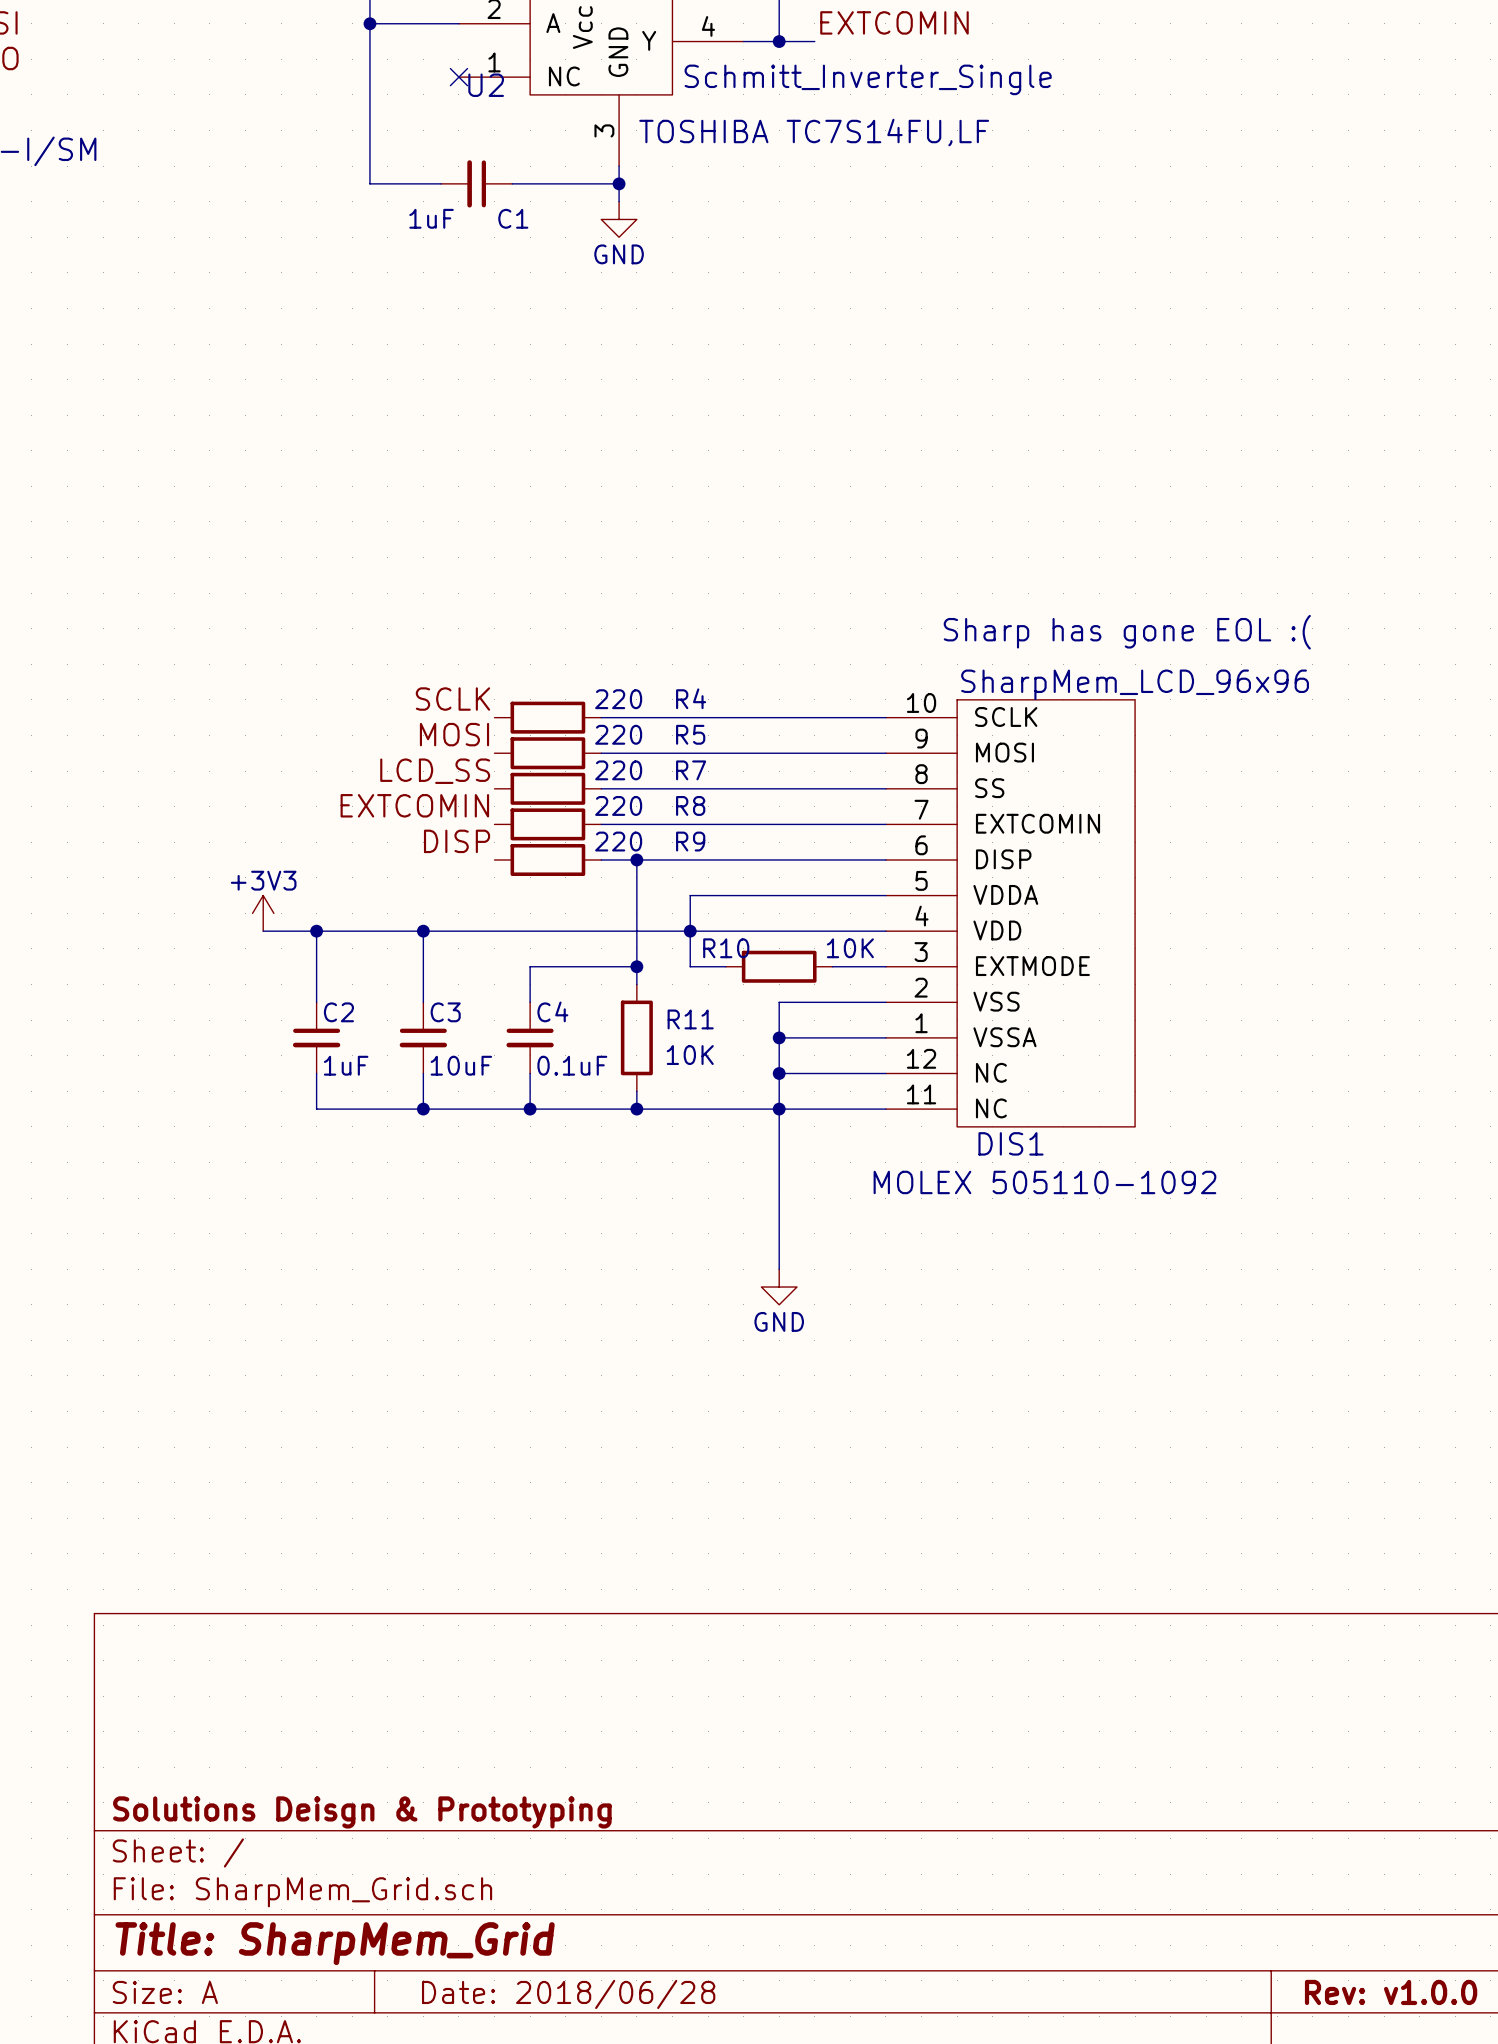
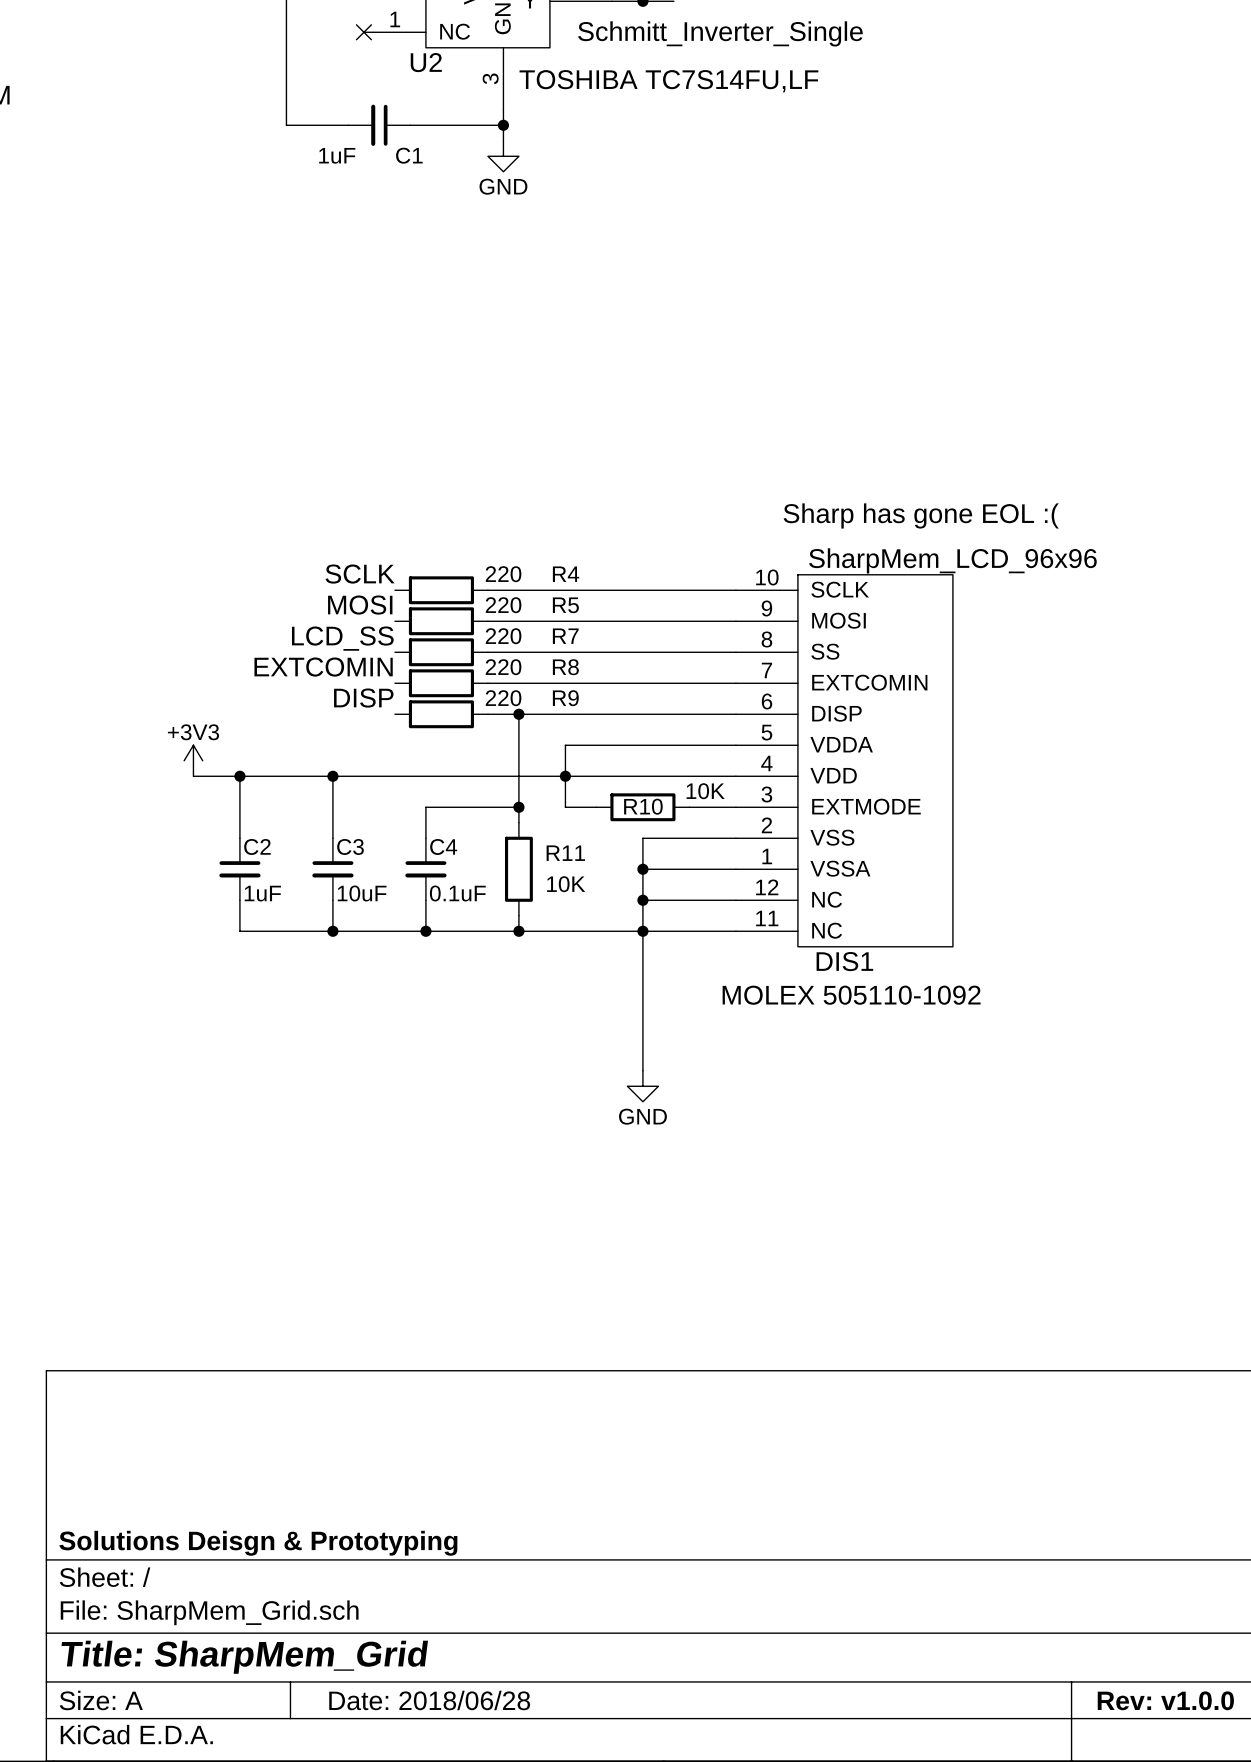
U2 name position: U2 (486, 85) -> U2 (426, 62)
R10 name position: R10 (726, 948) -> R10 (643, 806)

